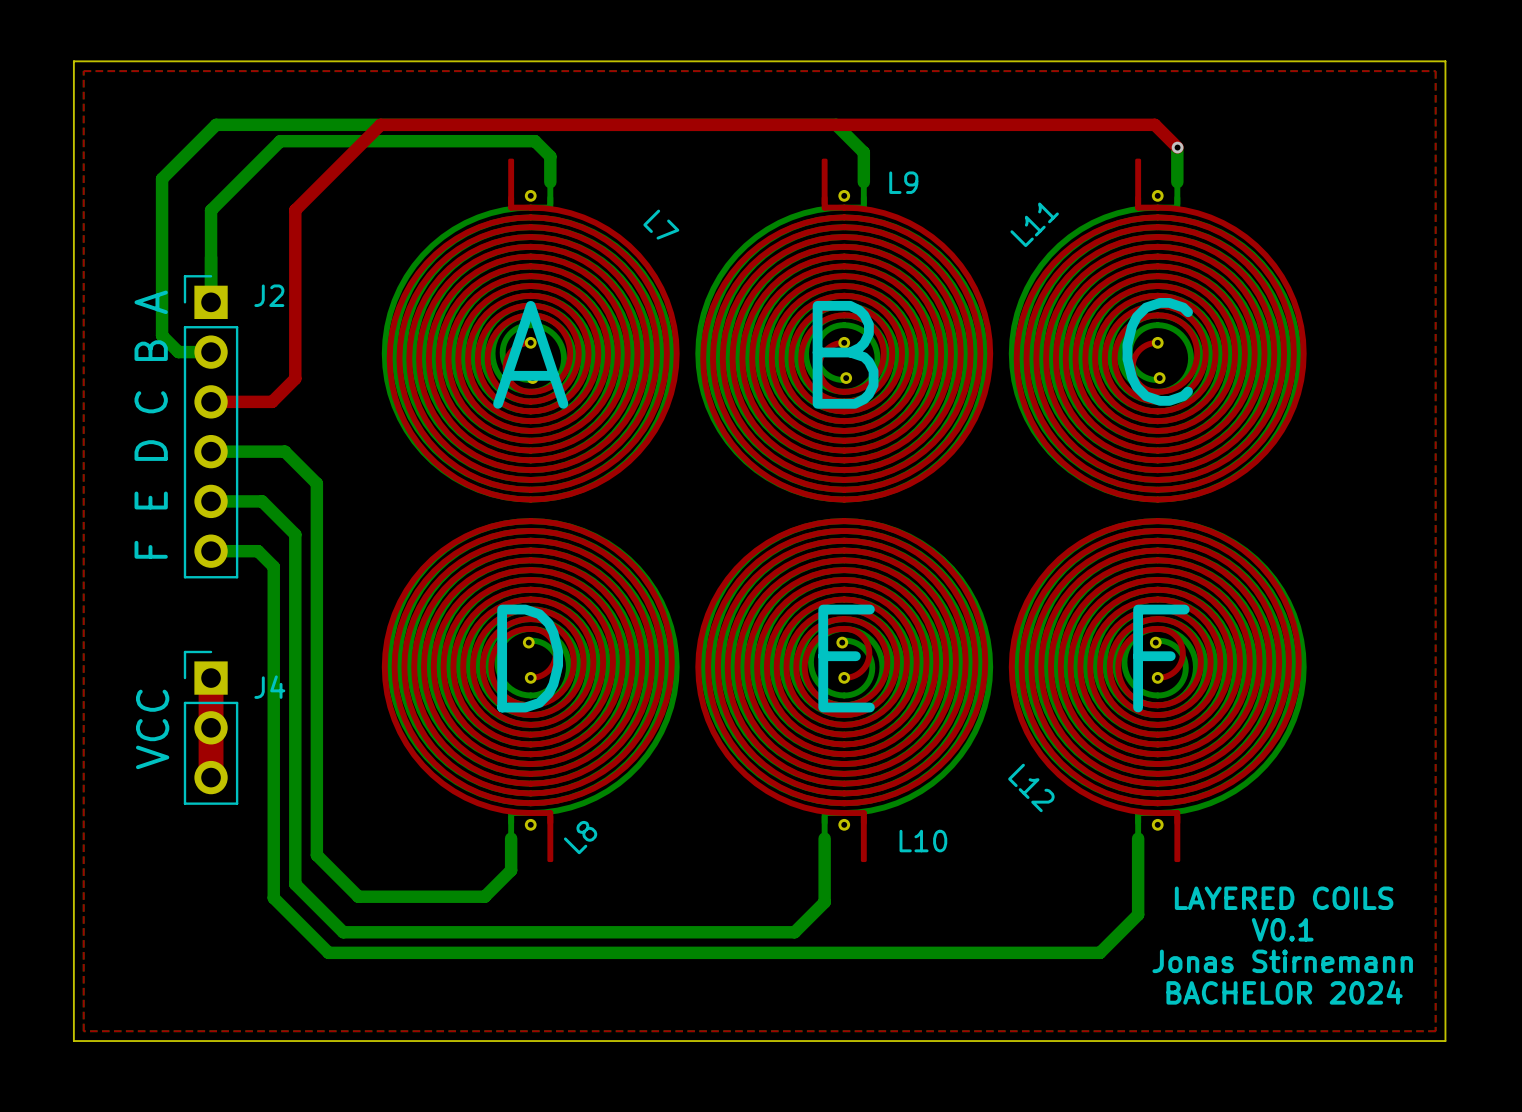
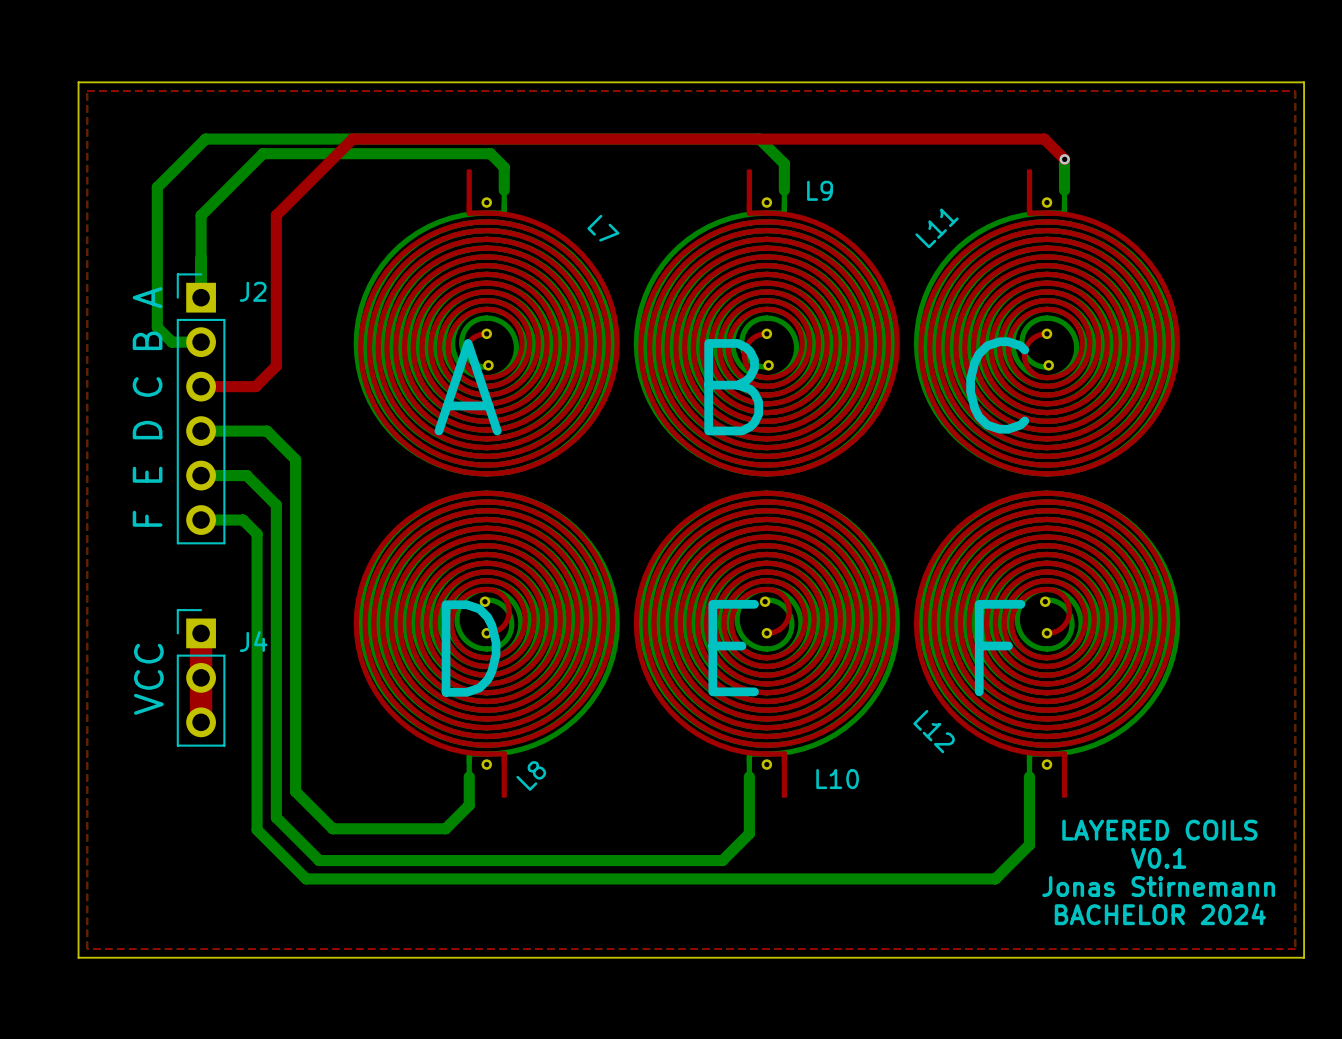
text position: C (1157, 351) -> C (997, 385)
text position: A (530, 354) -> A (468, 387)
text position: B (845, 354) -> B (733, 387)
text position: D (530, 658) -> D (471, 648)
text position: E (846, 658) -> E (733, 648)
text position: F (1161, 658) -> F (1000, 648)

